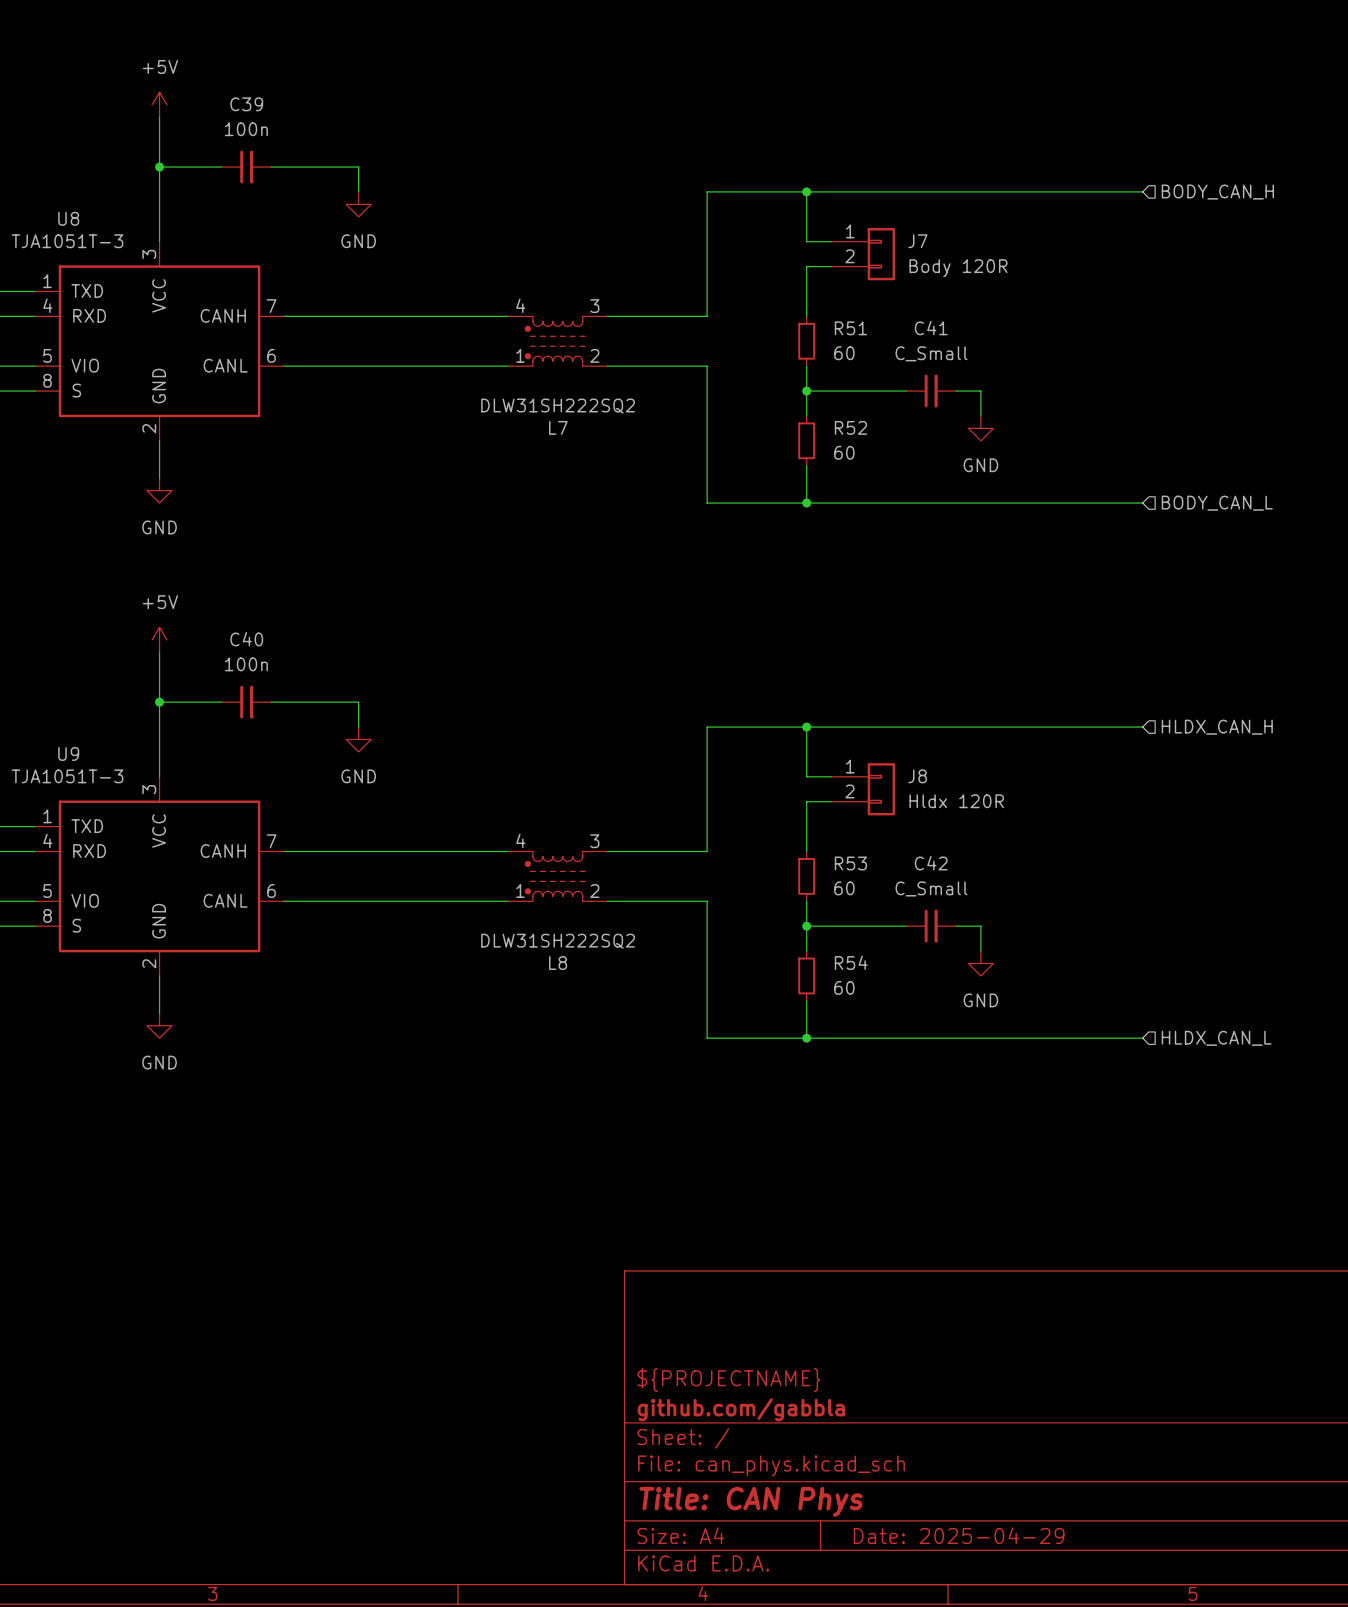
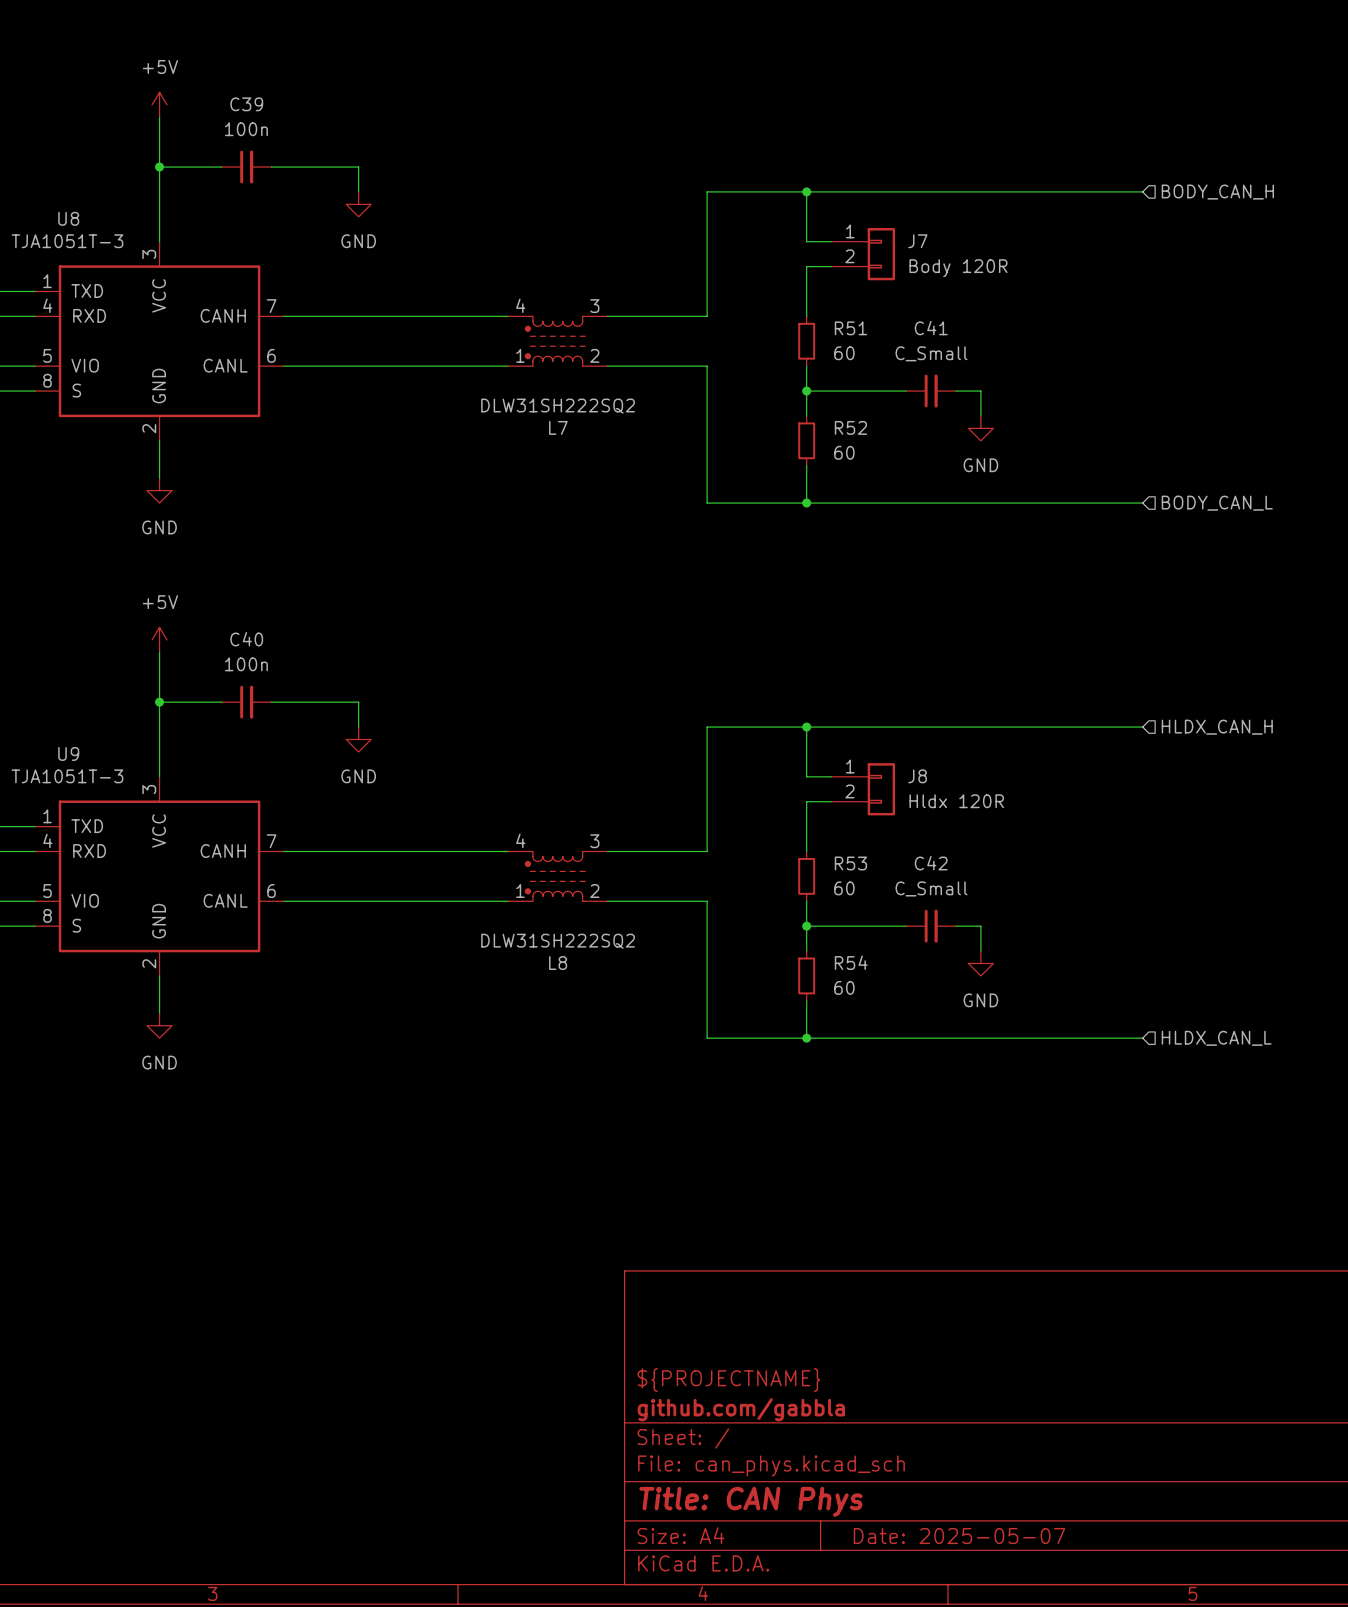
title block: Date: 2025-04-29 (959, 1535) -> Date: 2025-05-07 (959, 1536)

